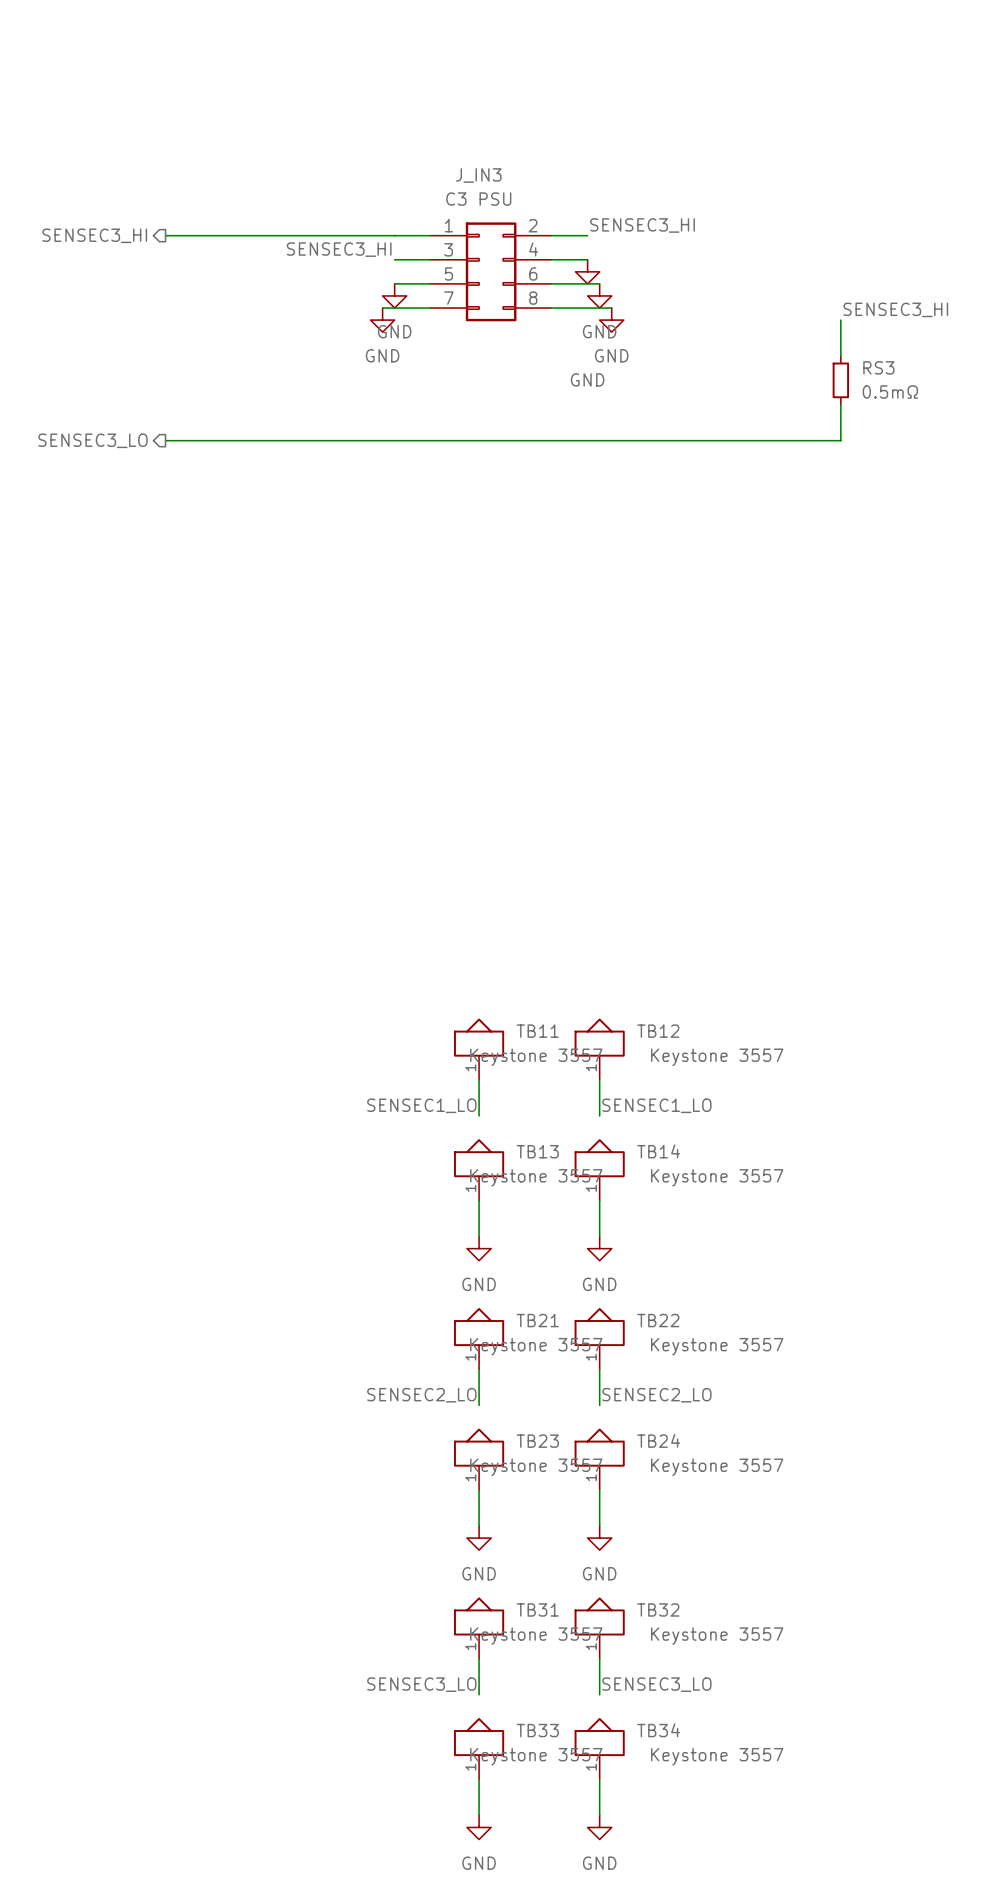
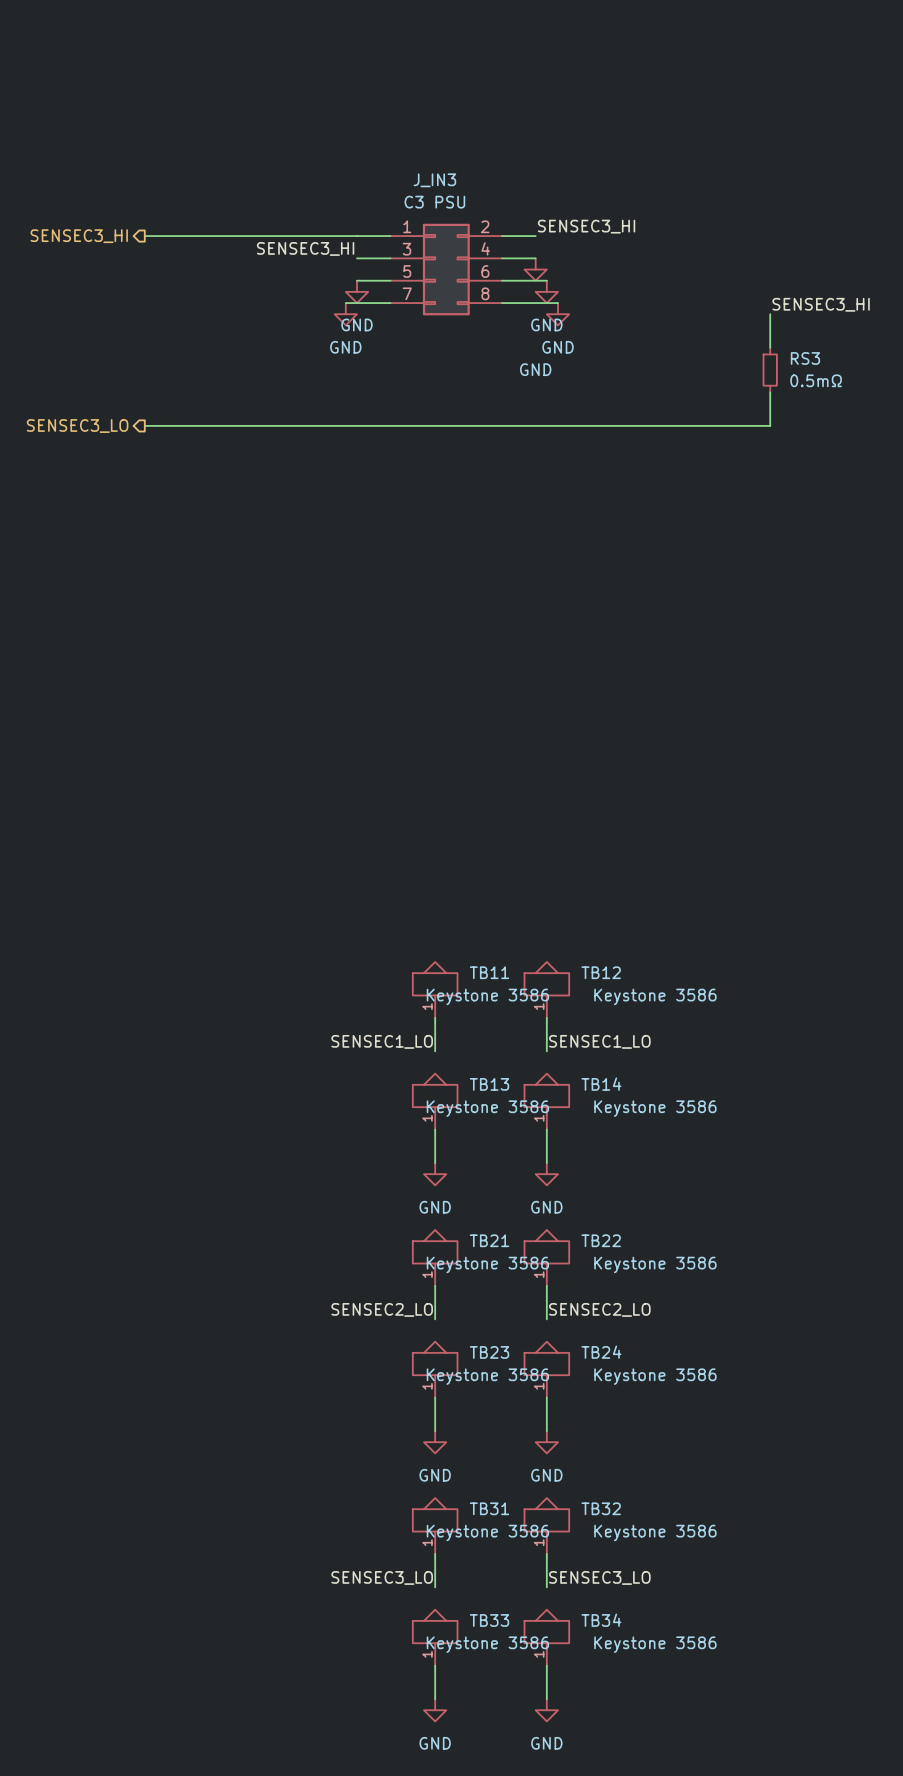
TB11 value: Keystone 3557 (536, 1057) -> Keystone 3586 (487, 996)
TB12 value: Keystone 3557 (717, 1057) -> Keystone 3586 (655, 996)
TB13 value: Keystone 3557 (536, 1177) -> Keystone 3586 (487, 1108)
TB14 value: Keystone 3557 (717, 1177) -> Keystone 3586 (655, 1108)
TB21 value: Keystone 3557 (536, 1346) -> Keystone 3586 (487, 1264)
TB22 value: Keystone 3557 (717, 1346) -> Keystone 3586 (655, 1264)
TB23 value: Keystone 3557 (536, 1467) -> Keystone 3586 (487, 1376)
TB24 value: Keystone 3557 (717, 1467) -> Keystone 3586 (655, 1376)
TB31 value: Keystone 3557 (536, 1636) -> Keystone 3586 (487, 1532)
TB32 value: Keystone 3557 (717, 1636) -> Keystone 3586 (655, 1532)
TB33 value: Keystone 3557 (536, 1756) -> Keystone 3586 (487, 1644)
TB34 value: Keystone 3557 (717, 1756) -> Keystone 3586 (655, 1644)

